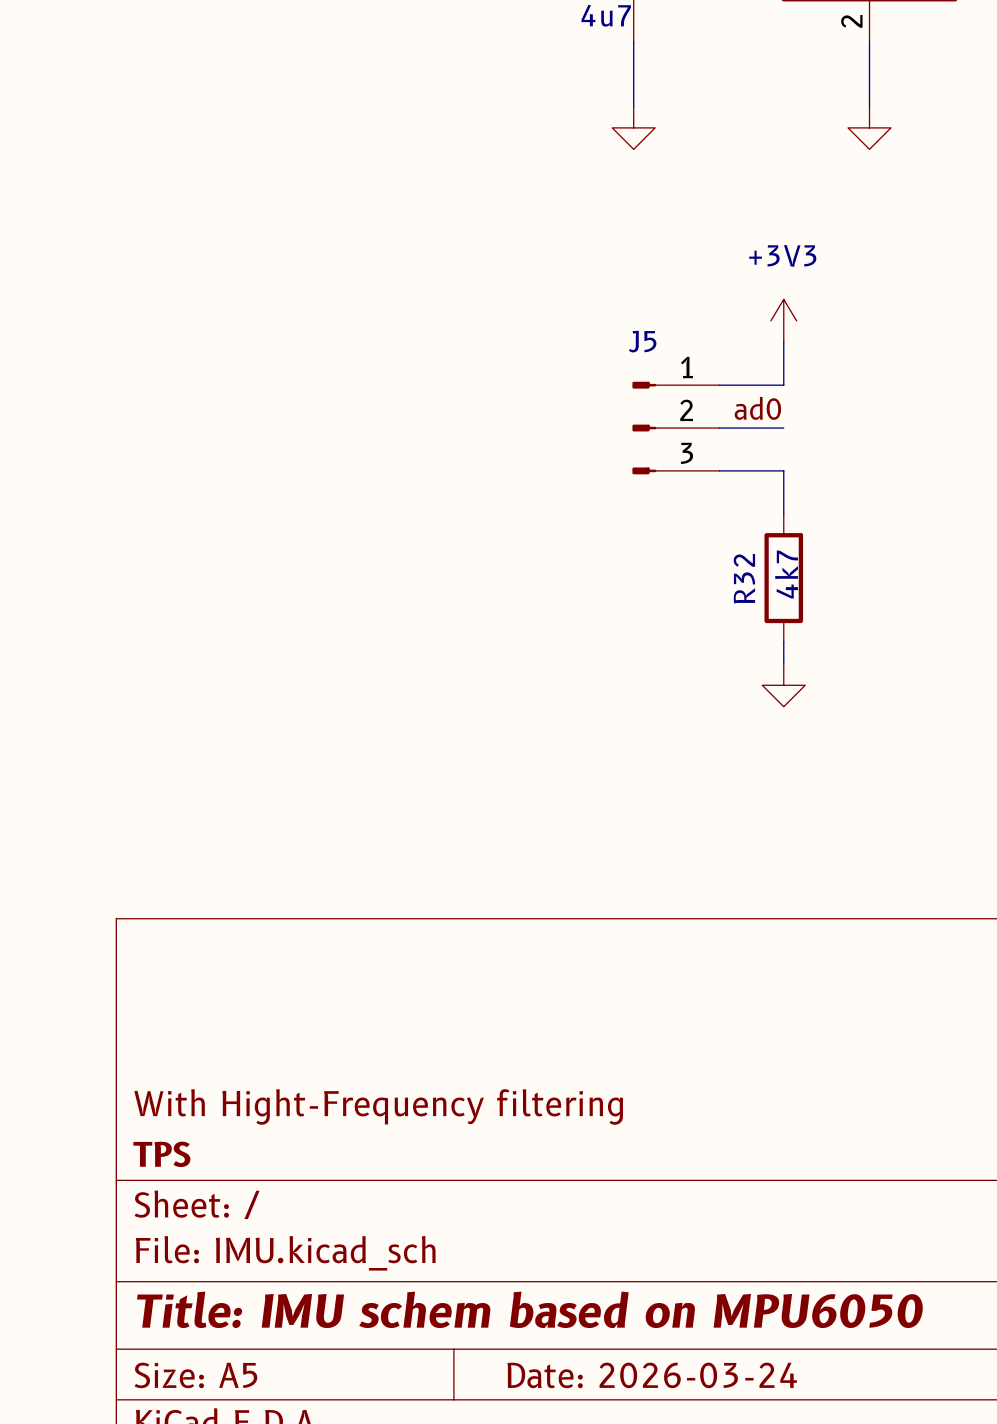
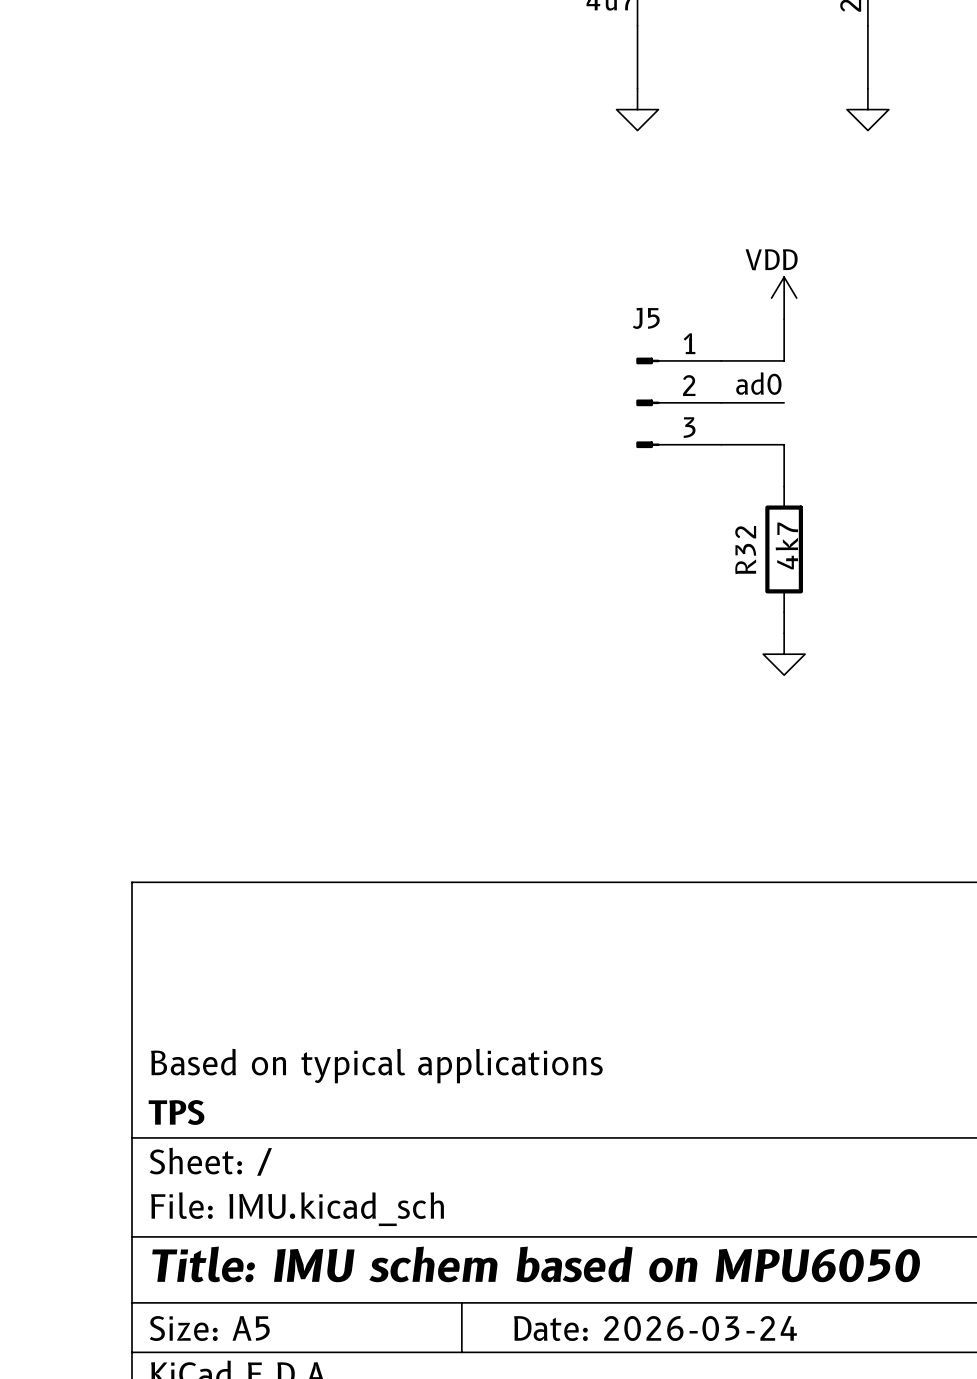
power symbol: +3V3 (783, 320) -> VDD (784, 298)
title block: With Hight-Frequency filtering (378, 1106) -> Based on typical applications (376, 1066)

